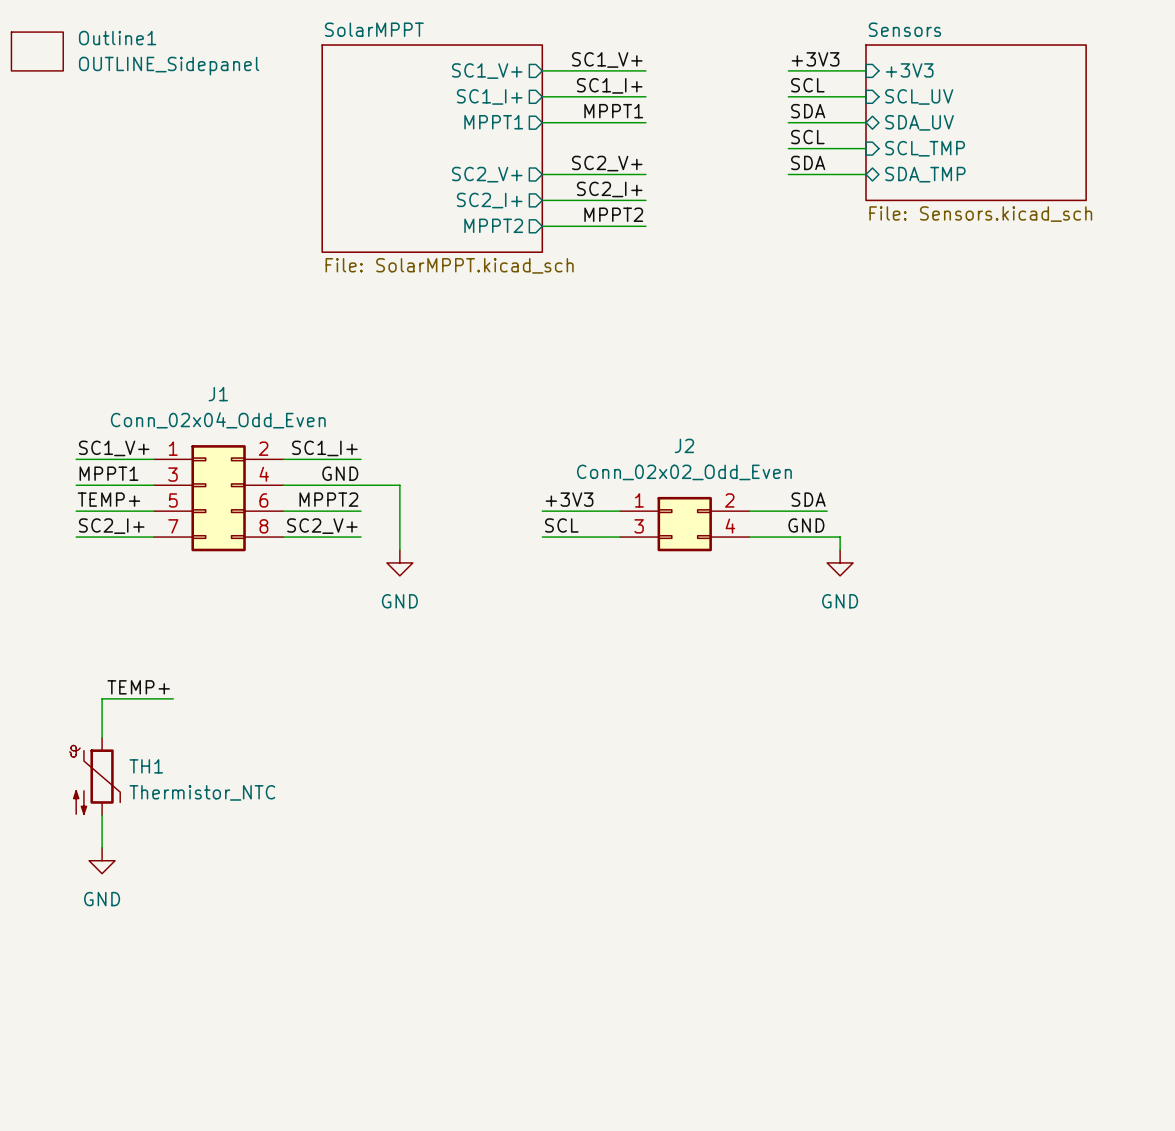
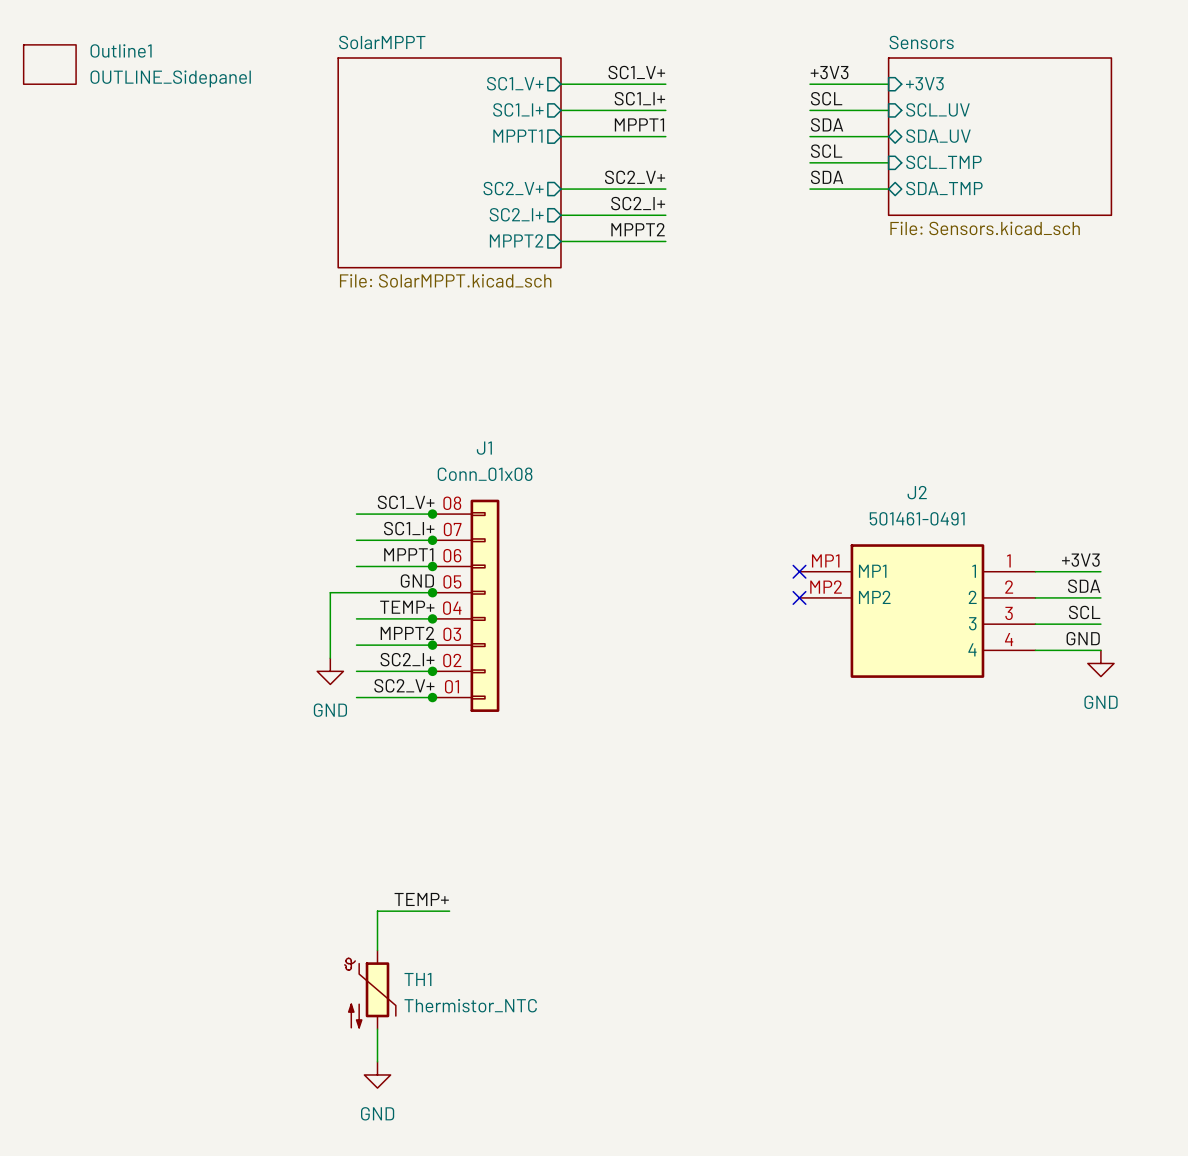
J1 name position: J1 (218, 394) -> J1 (484, 448)
J1 value: Conn_02x04_Odd_Even (218, 420) -> Conn_01x08 (485, 474)
J1 symbol: [153, 445, 284, 552] -> [432, 499, 500, 712]
label: SC1_V+ (114, 448) -> none
label position: SC1_I+ (324, 448) -> SC1_I+ (409, 528)
wire: (76, 459) (153, 459) -> none
wire: (283, 459) (361, 459) -> (356, 566) (435, 566)
label: MPPT1 (108, 473) -> none
label position: GND (340, 473) -> GND (417, 581)
label: none -> SC1_V+ (406, 502)
wire: (76, 485) (153, 485) -> none
wire: (283, 485) (399, 485) (399, 549) -> none
wire: none -> (356, 514) (435, 514)
junction: none -> (432, 514)
label: TEMP+ (108, 499) -> none
label position: MPPT2 (328, 499) -> MPPT2 (407, 633)
label: +3V3 (569, 499) -> none
label: SDA (808, 499) -> none
wire: (76, 511) (153, 511) -> none
wire: (283, 511) (361, 511) -> (356, 618) (435, 618)
wire: (542, 511) (619, 511) -> (356, 540) (435, 540)
wire: (749, 511) (827, 511) -> none
junction: none -> (432, 540)
J2: Conn_02x02_Odd_Even (684, 524) -> none
label: SCL (561, 525) -> none
label: GND (806, 525) -> none
label: SC2_I+ (111, 526) -> none
label position: SC2_V+ (322, 526) -> SC2_V+ (404, 685)
label: none -> MPPT1 (408, 554)
wire: (76, 537) (153, 537) -> none
wire: (283, 537) (361, 537) -> (356, 645) (435, 645)
wire: (542, 537) (619, 537) -> (356, 671) (435, 671)
wire: (749, 537) (840, 537) (840, 549) -> none
label: none -> +3V3 (1080, 560)
junction: none -> (432, 566)
no-connect mark: none -> (799, 571)
wire: none -> (1035, 571) (1100, 571)
power symbol position: GND (399, 562) -> GND (330, 671)
power symbol position: GND (840, 562) -> GND (1100, 663)
label: none -> SDA (1084, 586)
junction: none -> (432, 592)
wire: none -> (435, 592) (330, 592) (330, 658)
no-connect mark: none -> (799, 597)
wire: none -> (1035, 597) (1100, 597)
label: none -> TEMP+ (407, 607)
part: none -> (917, 611)
label: none -> SCL (1084, 612)
junction: none -> (432, 618)
wire: none -> (1035, 624) (1100, 624)
label: none -> GND (1083, 638)
junction: none -> (432, 645)
wire: none -> (1035, 650) (1100, 650)
label: none -> SC2_I+ (407, 659)
junction: none -> (432, 671)
wire: none -> (356, 697) (435, 697)
junction: none -> (432, 697)
label: TEMP+ (138, 687) -> none
wire: (173, 698) (102, 698) (102, 737) -> none
TH1 symbol: [69, 737, 121, 816] -> [344, 950, 396, 1030]
wire: (102, 815) (102, 847) -> none
power symbol: GND (102, 860) -> none
label: none -> TEMP+ (421, 899)
wire: none -> (449, 911) (377, 911) (377, 950)
wire: none -> (377, 1029) (377, 1061)
power symbol: none -> GND (377, 1074)

